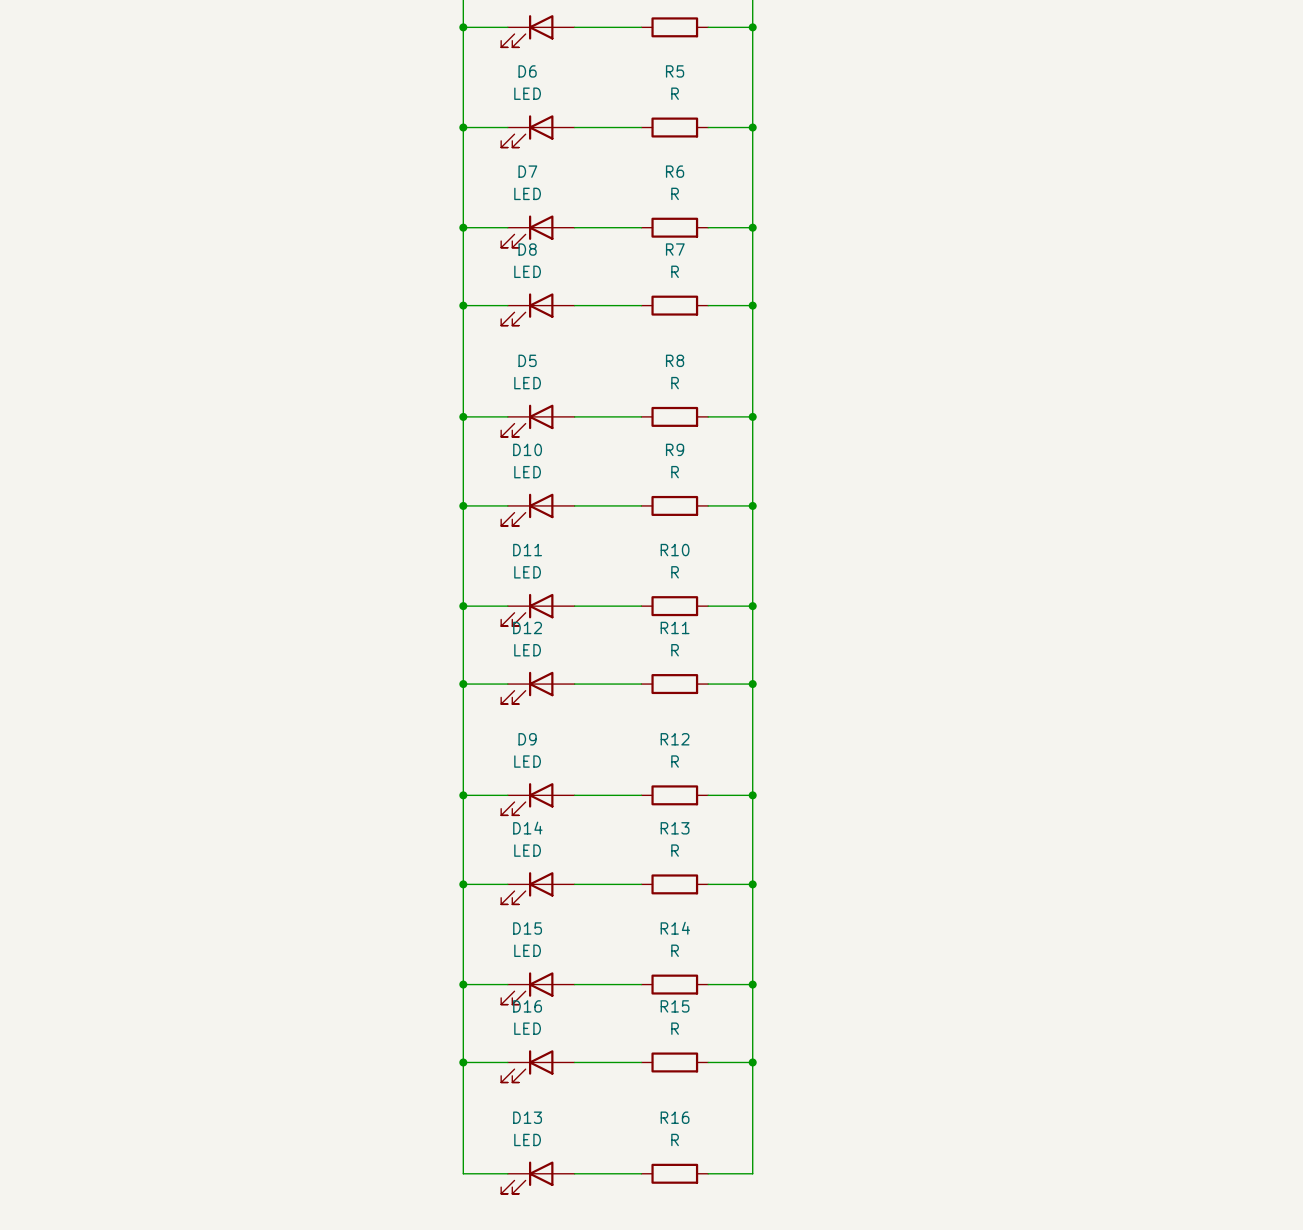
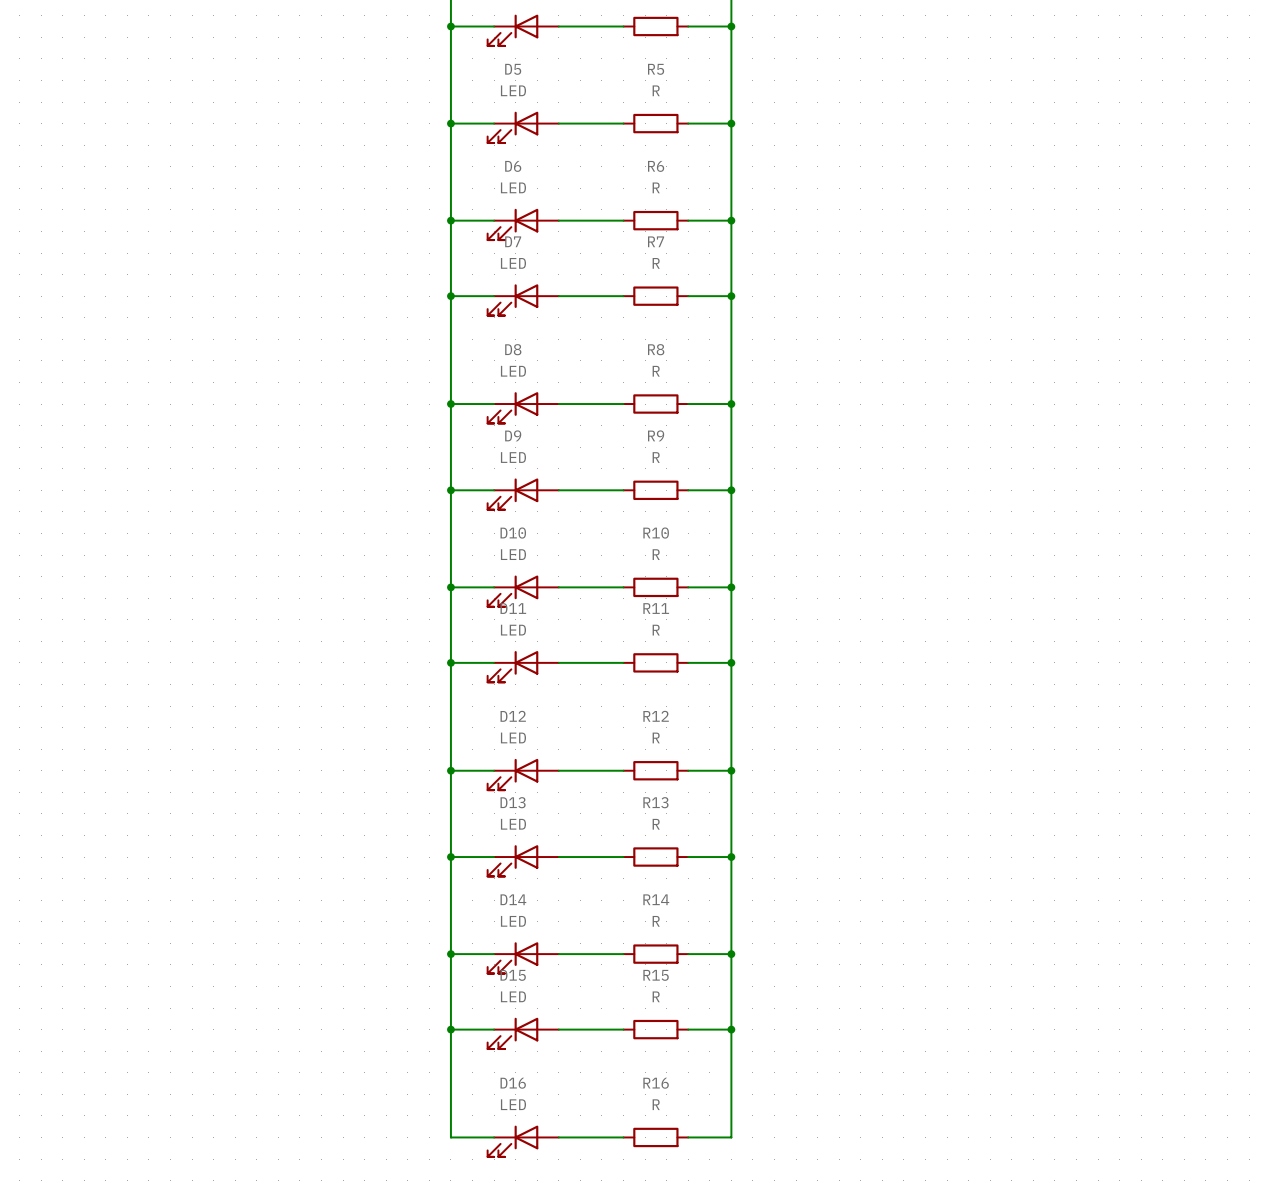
D6 name: D6 (527, 71) -> D5 (513, 69)
D7 name: D7 (527, 171) -> D6 (513, 166)
D8 name: D8 (527, 249) -> D7 (513, 241)
D5 name: D5 (527, 360) -> D8 (513, 349)
D10 name: D10 (527, 449) -> D9 (513, 435)
D11 name: D11 (527, 550) -> D10 (513, 533)
D12 name: D12 (527, 627) -> D11 (513, 608)
D9 name: D9 (527, 739) -> D12 (513, 716)
D14 name: D14 (527, 828) -> D13 (513, 802)
D15 name: D15 (527, 928) -> D14 (513, 899)
D16 name: D16 (527, 1006) -> D15 (513, 975)
D13 name: D13 (527, 1117) -> D16 (513, 1083)

